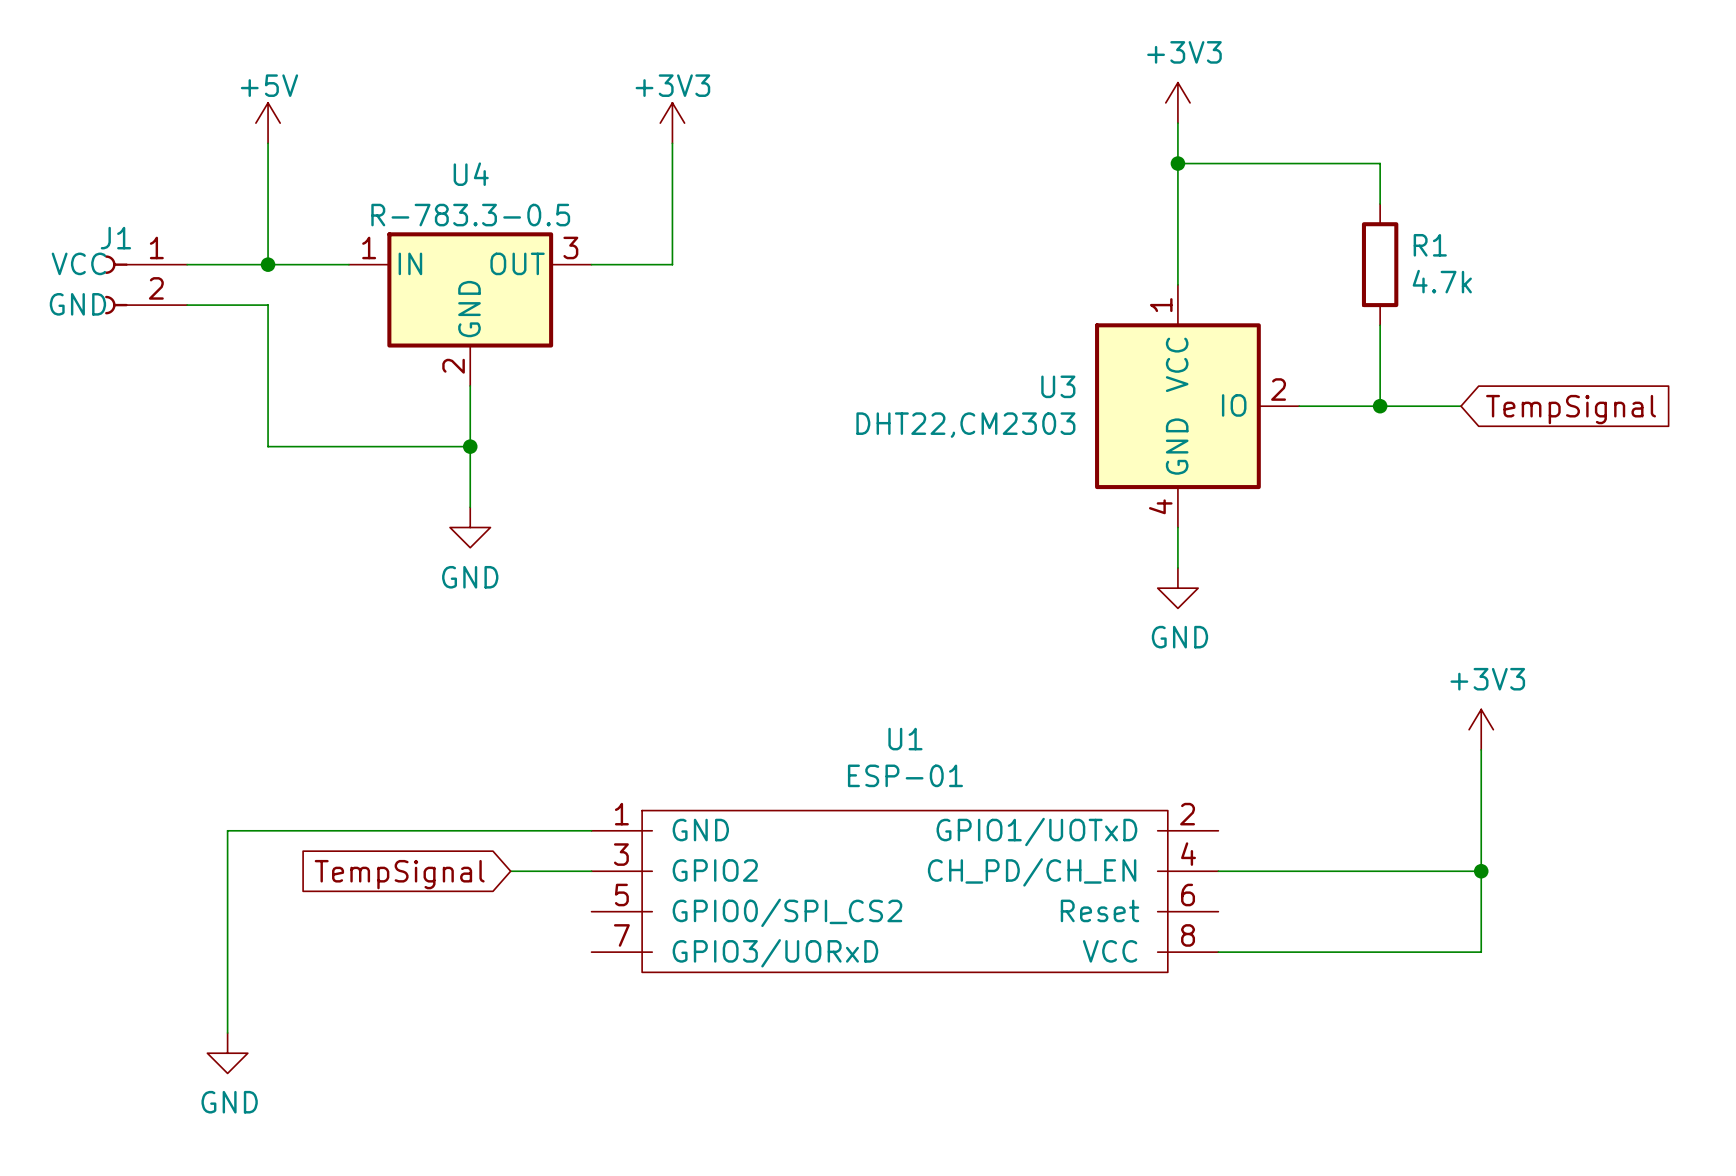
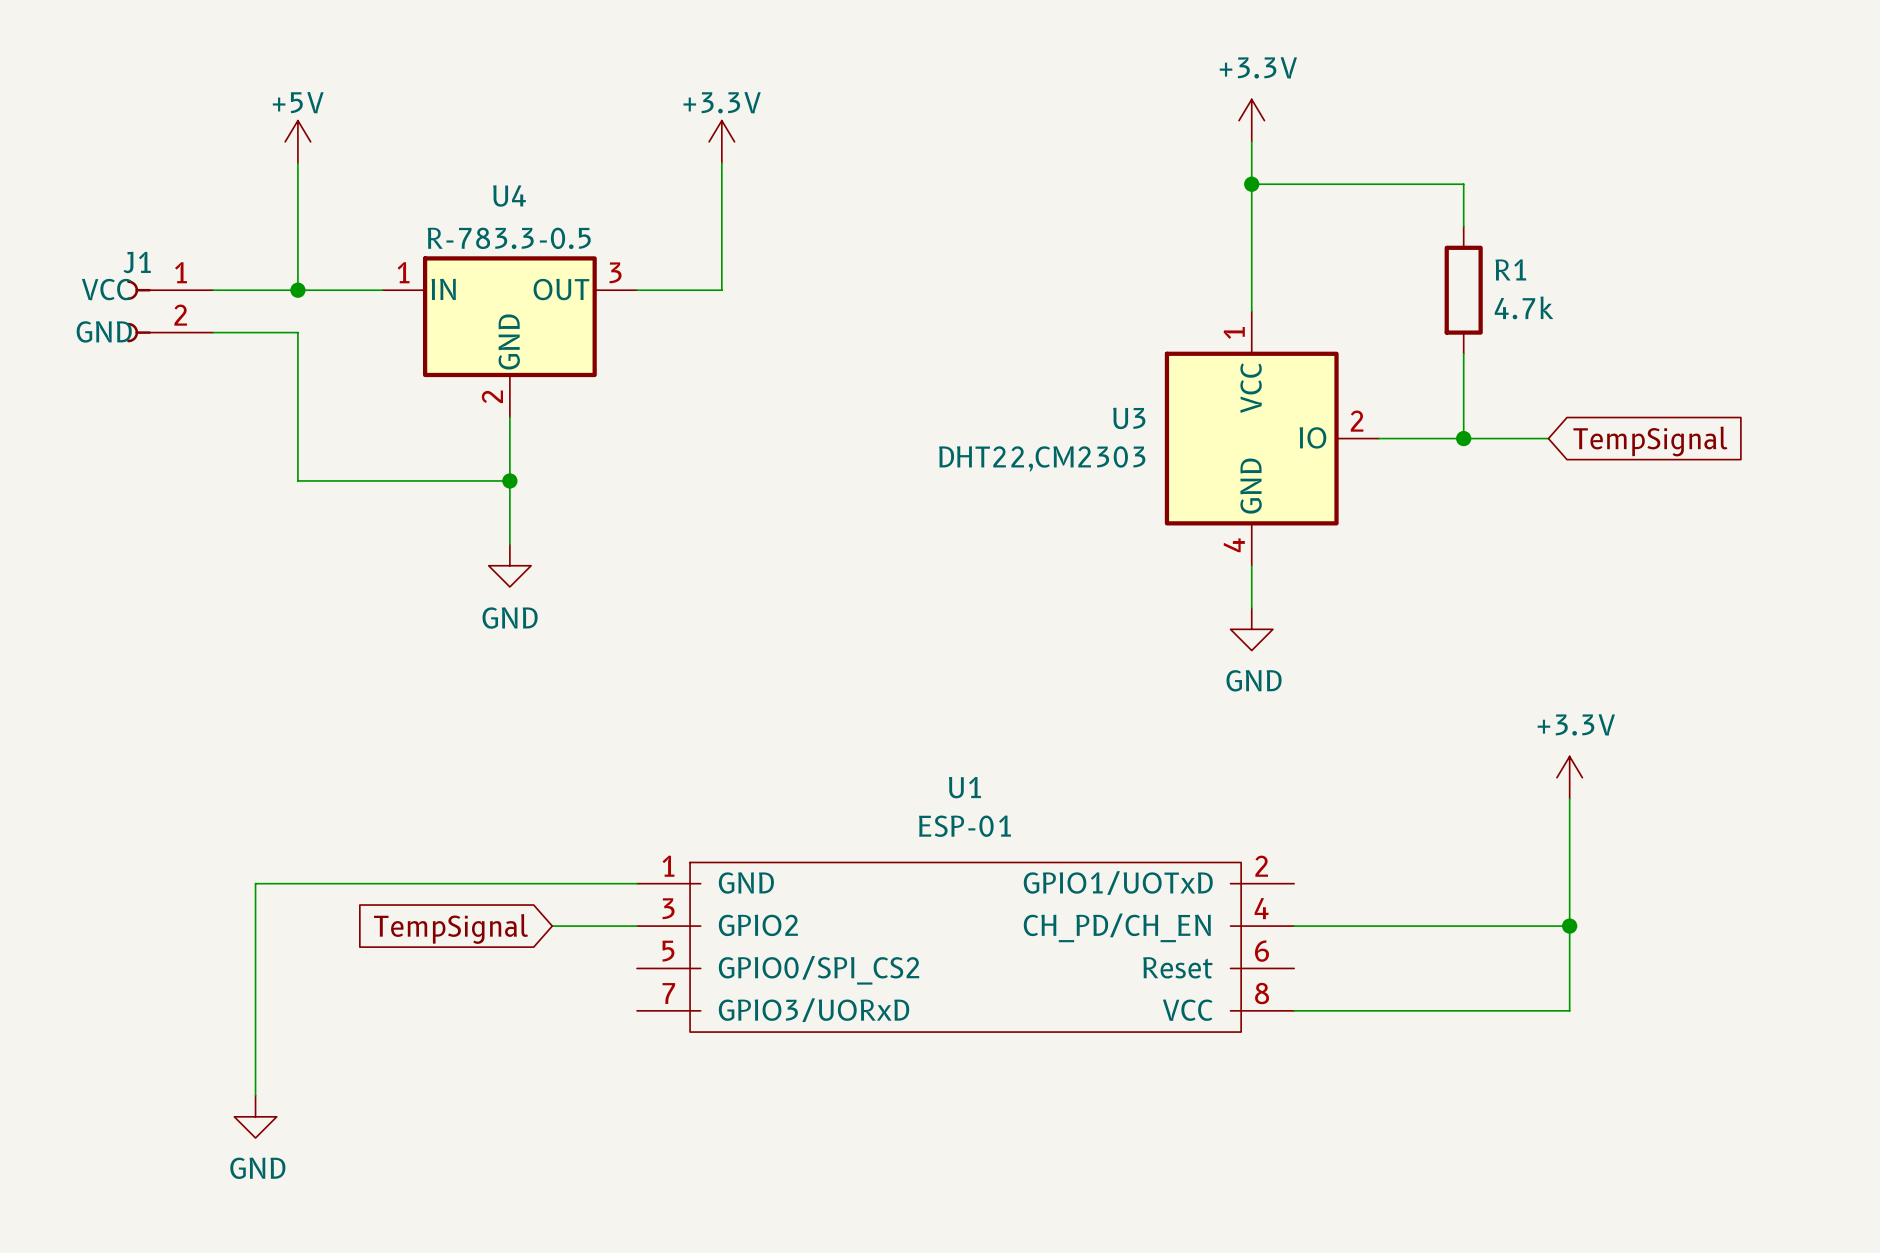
power symbol: +3V3 (1177, 102) -> +3.3V (1251, 120)
power symbol: +3V3 (672, 123) -> +3.3V (721, 141)
power symbol: +3V3 (1481, 729) -> +3.3V (1569, 777)

